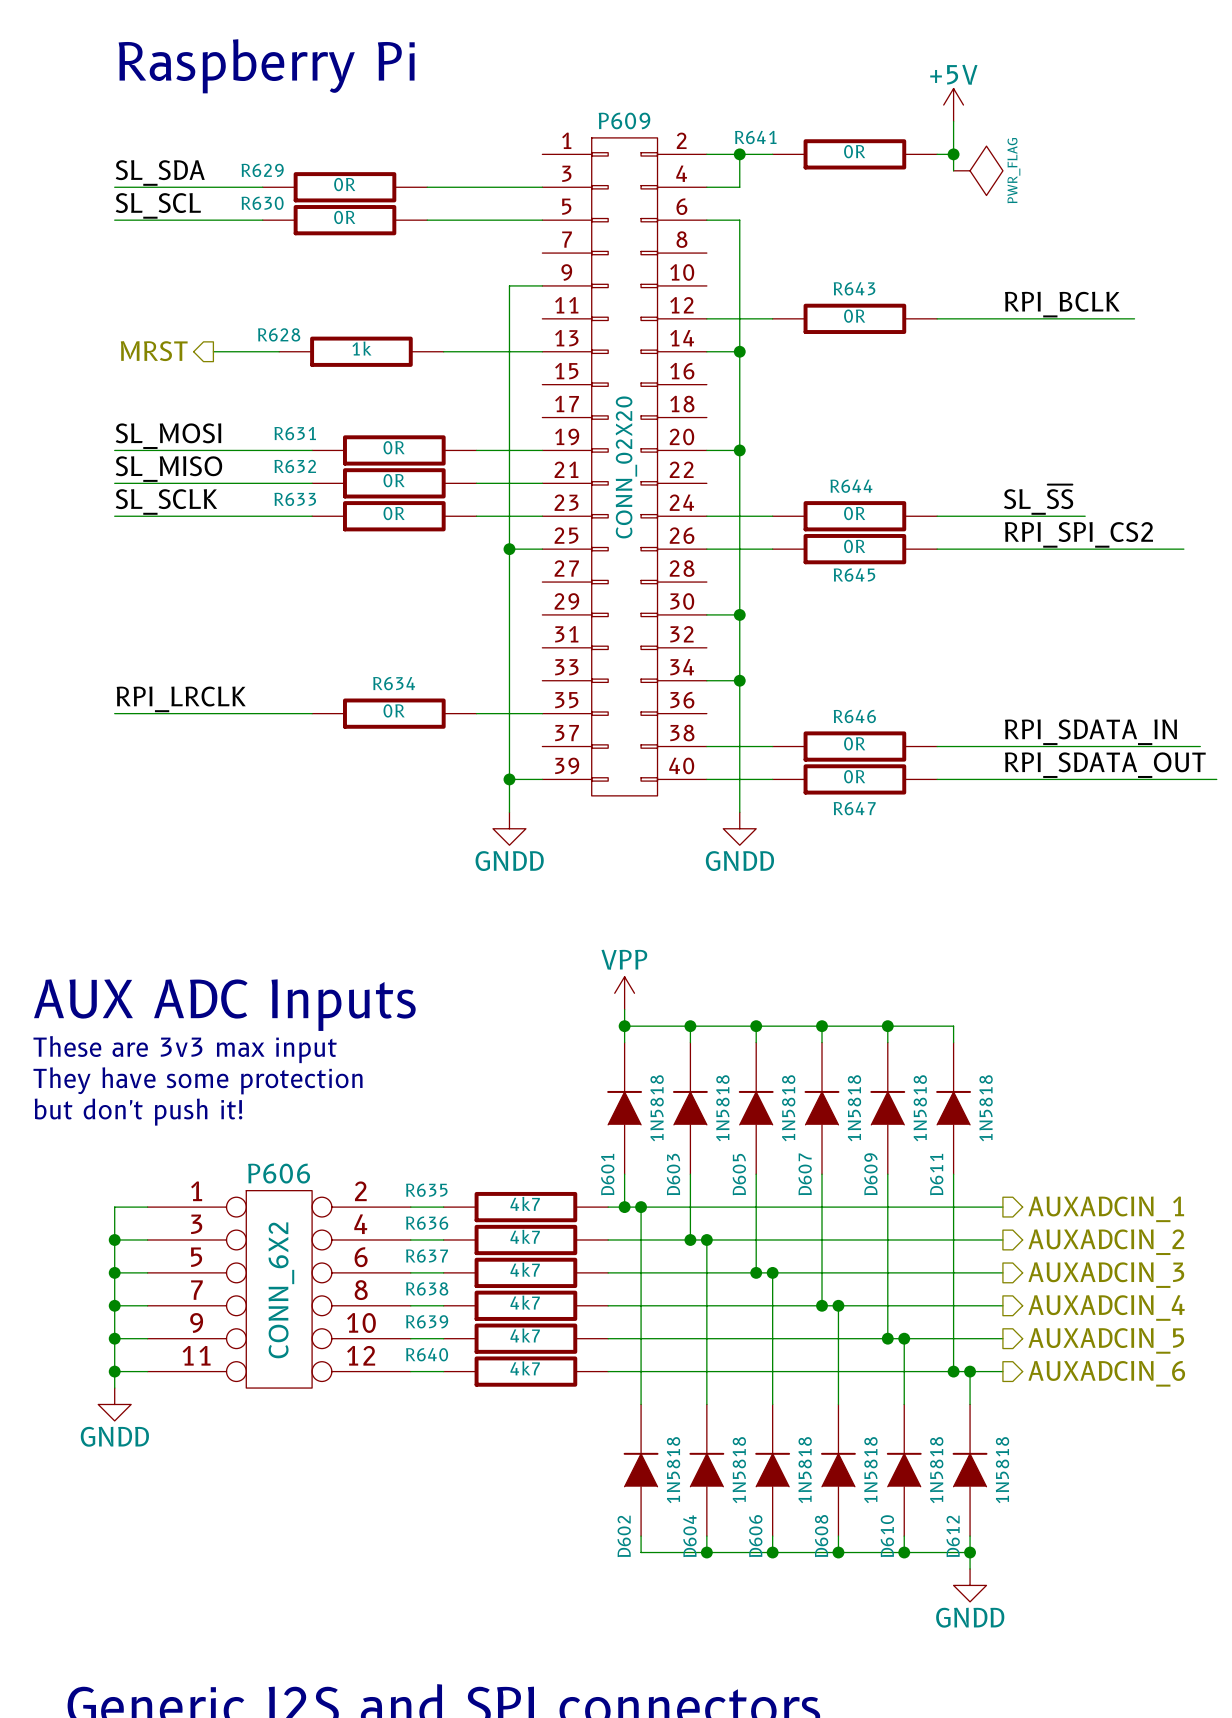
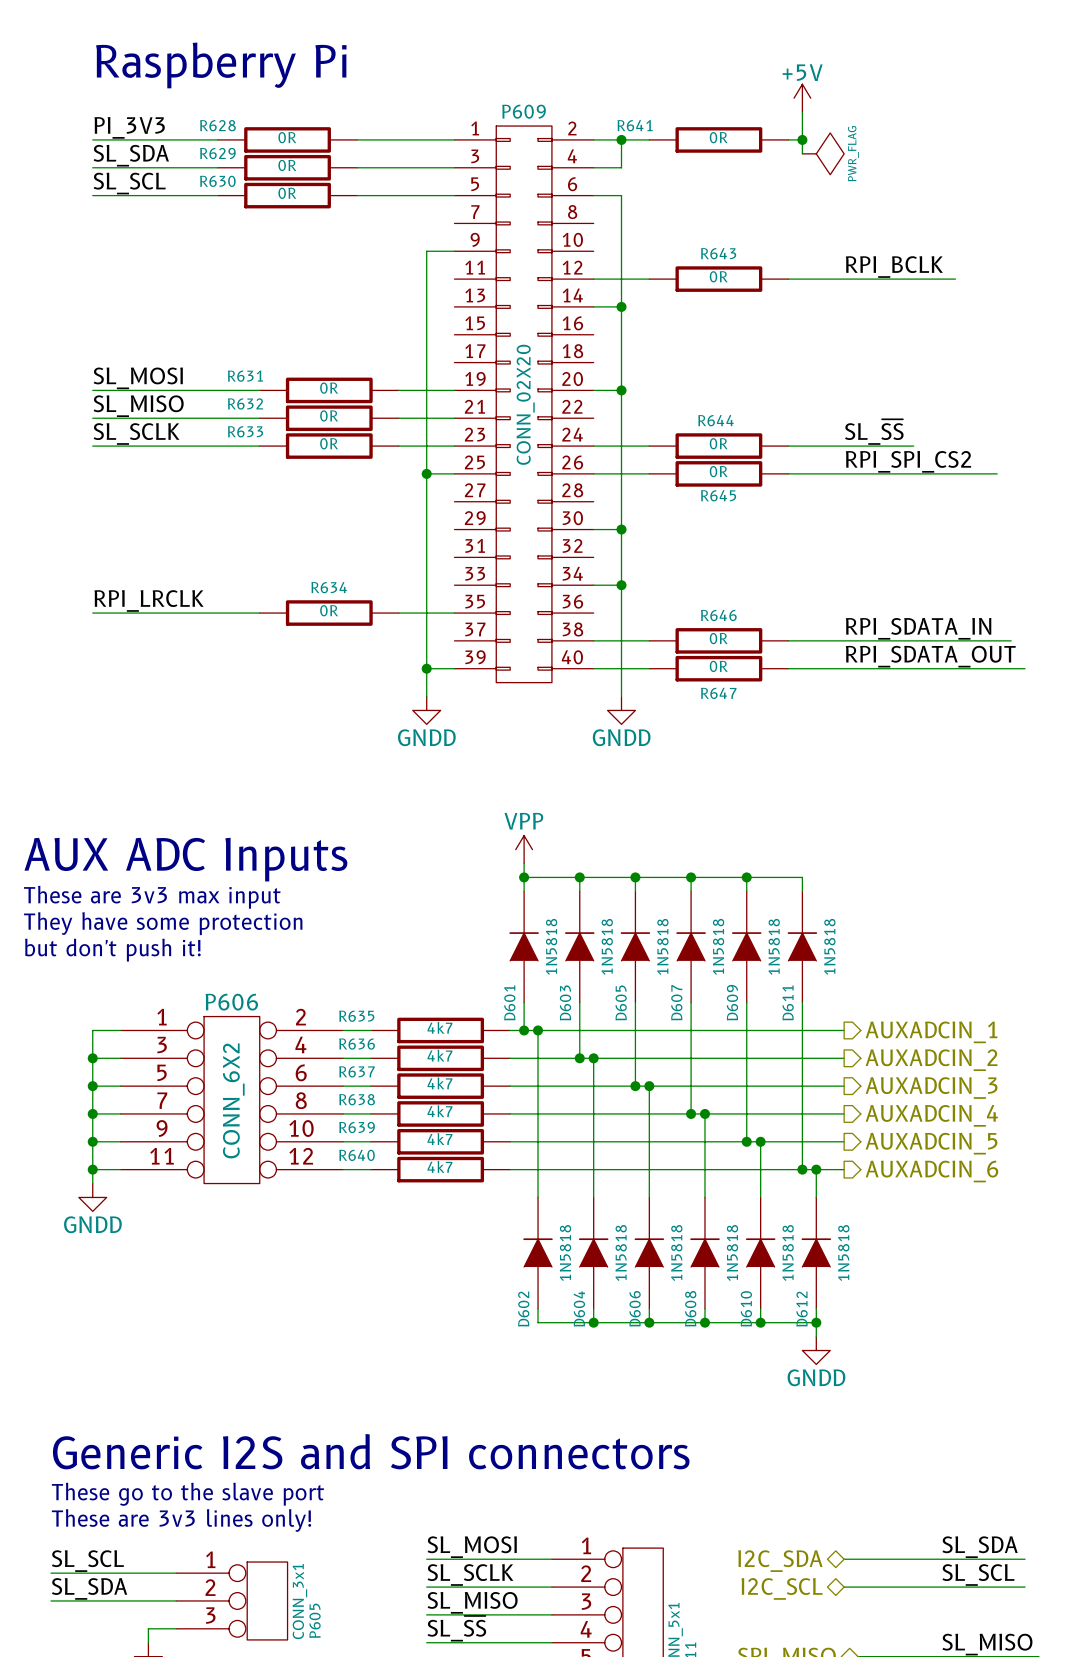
label: none -> PI_3V3 (129, 127)
wire: none -> (92, 139) (217, 139)
wire: none -> (357, 139) (454, 139)
R628 value: 1k (361, 348) -> 0R (287, 137)
hierarchical label: MRST (154, 351) -> none
wire: (213, 351) (279, 351) -> none
R628 position: (361, 351) -> (287, 139)
wire: (443, 351) (542, 351) -> none

